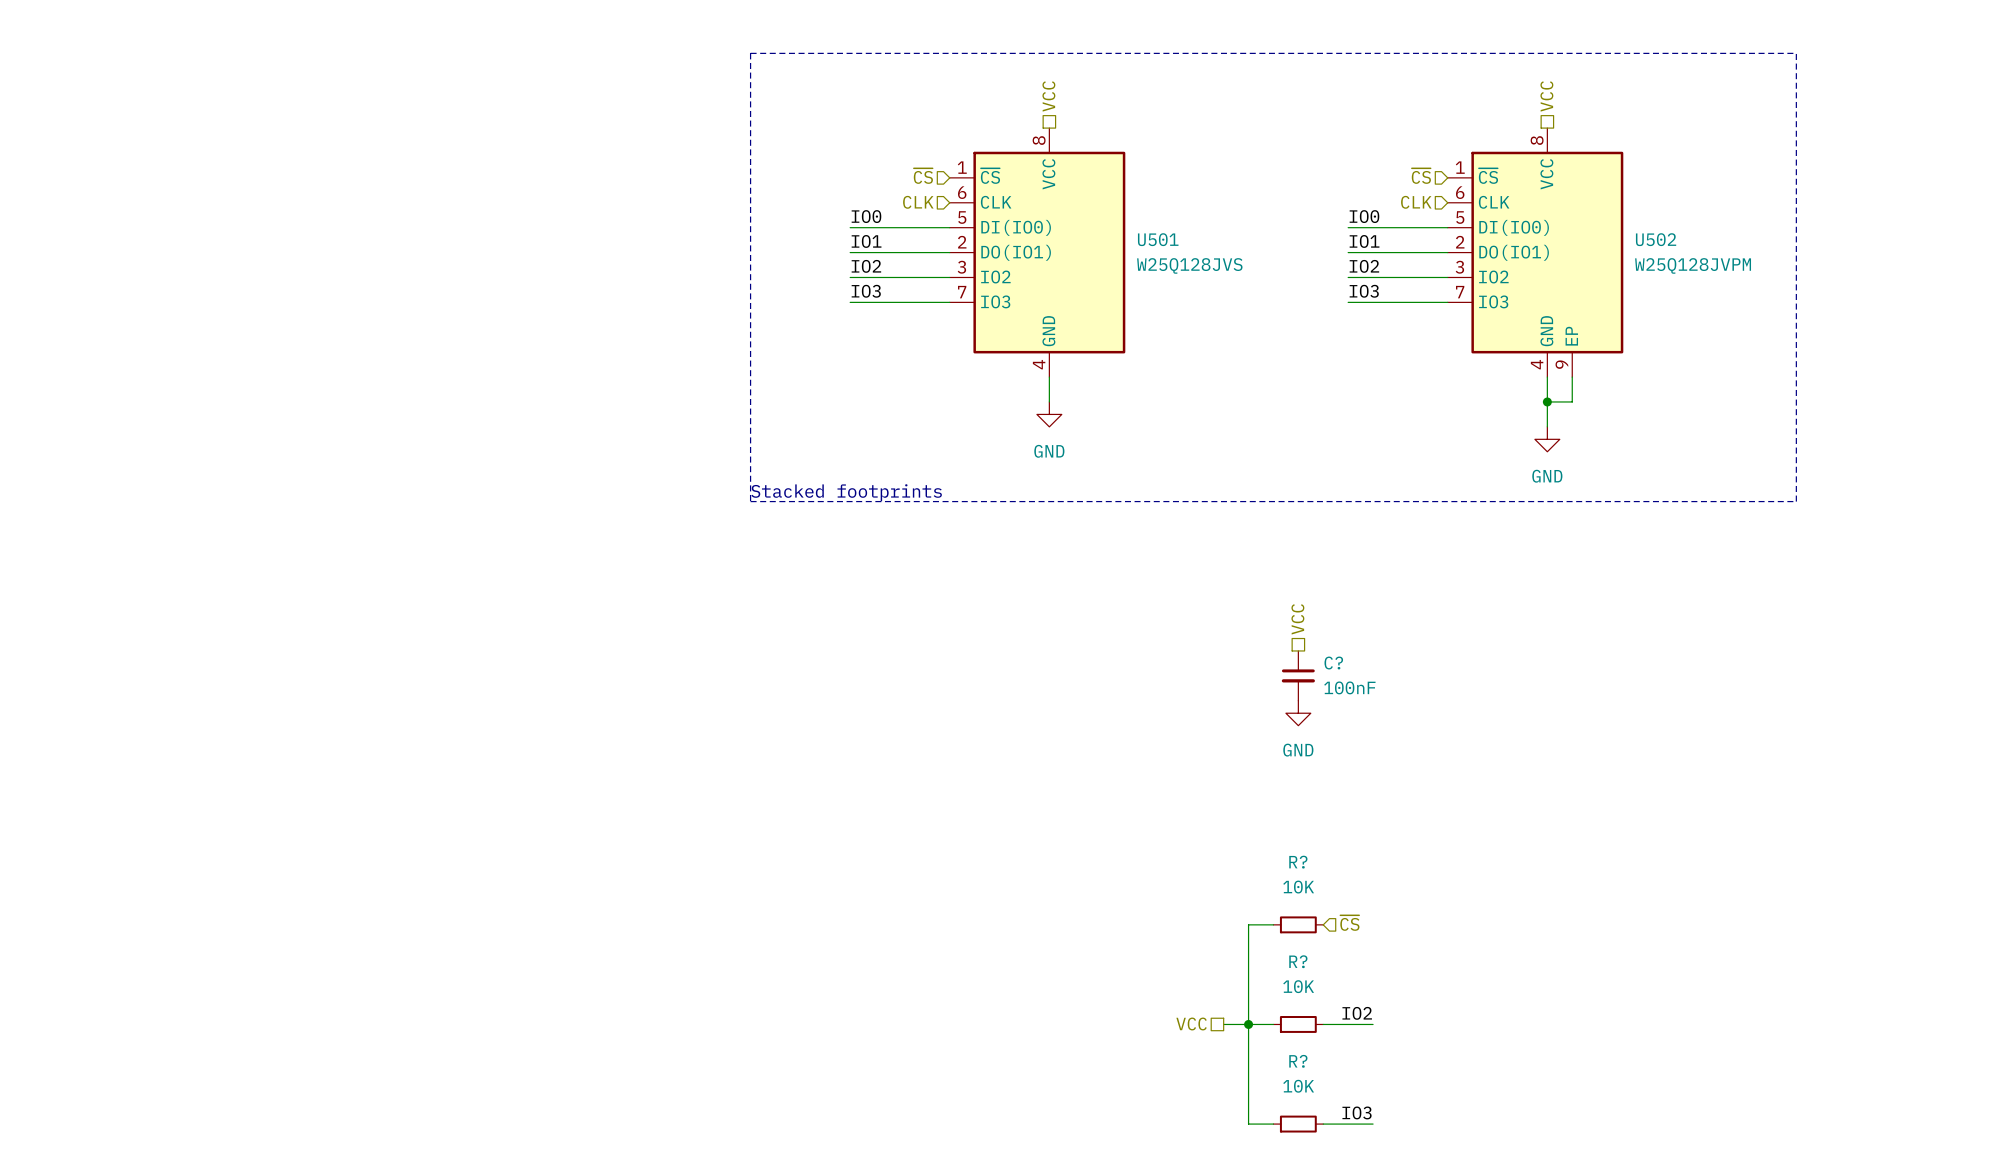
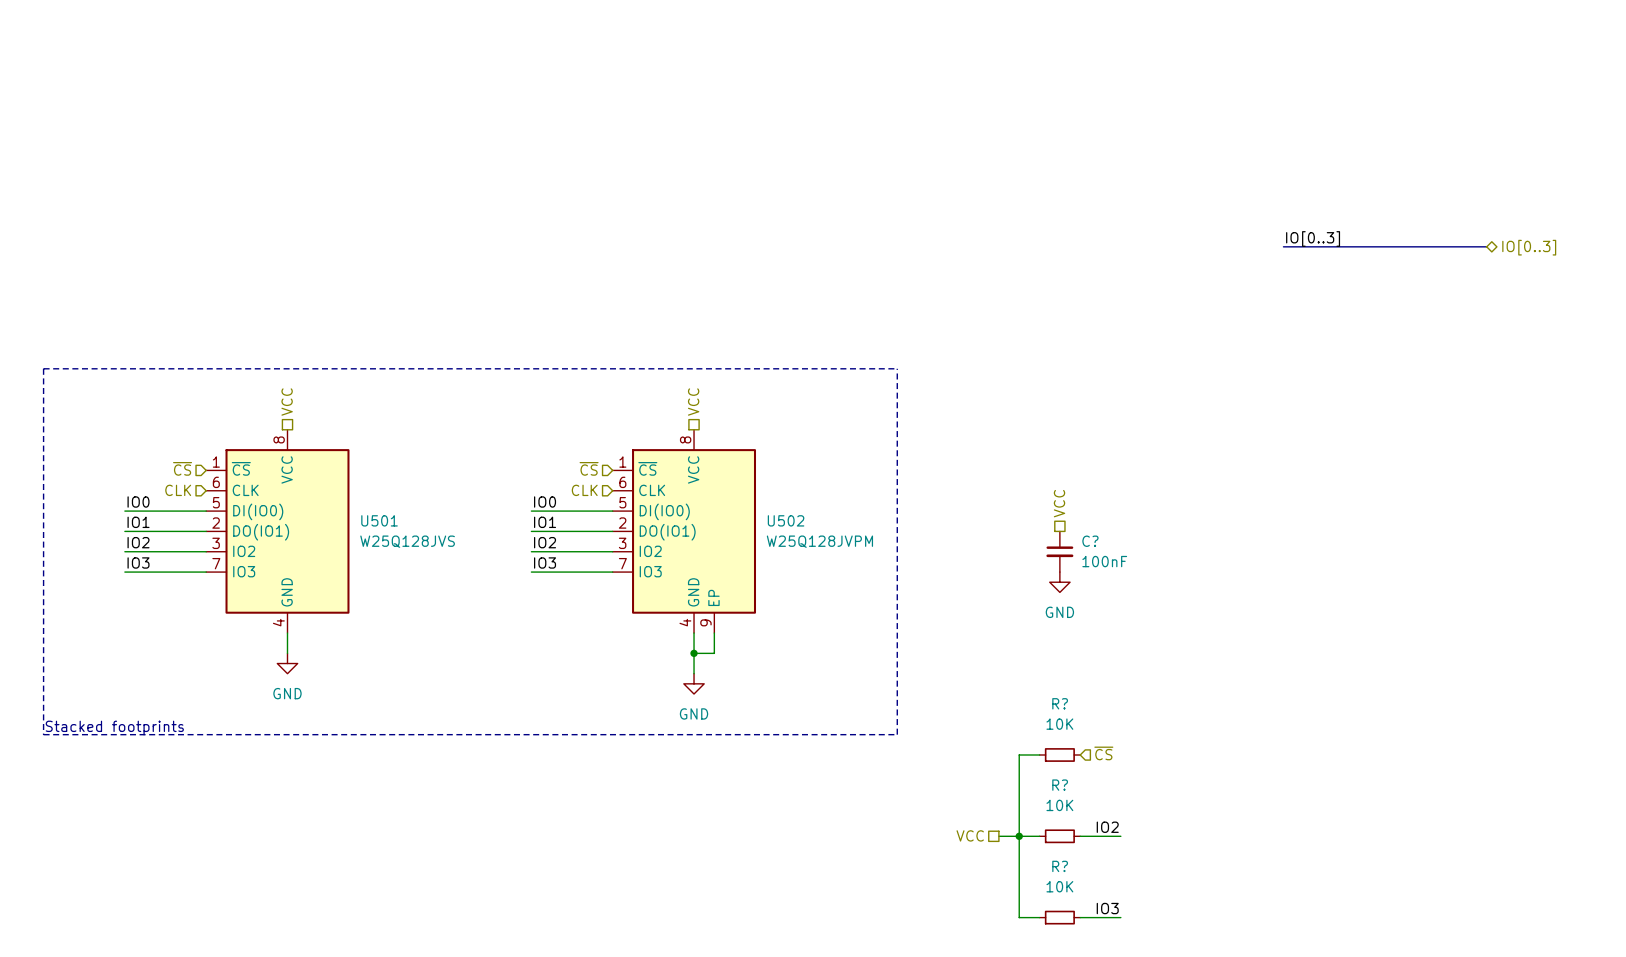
line: (750, 53) (750, 501) (1796, 501) (1796, 53) (750, 53) -> none
hierarchical label: VCC (1048, 96) -> none
hierarchical label: VCC (1546, 96) -> none
hierarchical label: ~{CS} (923, 176) -> none
hierarchical label: ~{CS} (1421, 176) -> none
hierarchical label: CLK (918, 202) -> none
hierarchical label: CLK (1416, 202) -> none
label: IO0 (866, 216) -> none
label: IO0 (1364, 216) -> none
wire: (850, 227) (949, 227) -> none
wire: (1348, 227) (1447, 227) -> none
label: IO1 (866, 241) -> none
label: IO1 (1364, 241) -> none
wire: (850, 252) (949, 252) -> none
U501 position: (1037, 252) -> (277, 531)
wire: (1348, 252) (1447, 252) -> none
U502 position: (1535, 252) -> (684, 531)
label: IO2 (866, 266) -> none
label: IO2 (1364, 266) -> none
wire: (850, 277) (949, 277) -> none
wire: (1348, 277) (1447, 277) -> none
label: IO3 (866, 291) -> none
label: IO3 (1364, 291) -> none
label: none -> IO[0..3] (1313, 238)
wire: (850, 302) (949, 302) -> none
wire: (1348, 302) (1447, 302) -> none
bus: none -> (1283, 246) (1486, 246)
hierarchical label: none -> IO[0..3] (1529, 247)
wire: (1049, 377) (1049, 401) -> none
wire: (1547, 377) (1547, 426) -> none
wire: (1572, 377) (1572, 401) (1547, 401) -> none
junction: (1547, 401) -> none
power symbol: GND (1049, 414) -> none
power symbol: GND (1547, 439) -> none
line: none -> (43, 368) (43, 734) (897, 734) (897, 368) (43, 368)
text: Stacked footprints (846, 492) -> none
hierarchical label: none -> VCC (287, 402)
hierarchical label: none -> VCC (693, 402)
hierarchical label: none -> ~{CS} (182, 468)
hierarchical label: none -> ~{CS} (589, 468)
hierarchical label: none -> CLK (178, 490)
hierarchical label: none -> CLK (584, 490)
label: none -> IO0 (138, 502)
label: none -> IO0 (545, 502)
wire: none -> (124, 511) (206, 511)
wire: none -> (531, 511) (612, 511)
label: none -> IO1 (138, 522)
label: none -> IO1 (545, 522)
wire: none -> (124, 531) (206, 531)
wire: none -> (531, 531) (612, 531)
label: none -> IO2 (138, 542)
label: none -> IO2 (545, 542)
wire: none -> (124, 551) (206, 551)
wire: none -> (531, 551) (612, 551)
label: none -> IO3 (138, 562)
label: none -> IO3 (545, 562)
wire: none -> (124, 572) (206, 572)
wire: none -> (531, 572) (612, 572)
wire: none -> (287, 633) (287, 653)
wire: none -> (694, 633) (694, 673)
wire: none -> (714, 633) (714, 653) (694, 653)
junction: none -> (694, 653)
power symbol: none -> GND (287, 663)
power symbol: none -> GND (694, 683)
text: none -> Stacked footprints (114, 728)

